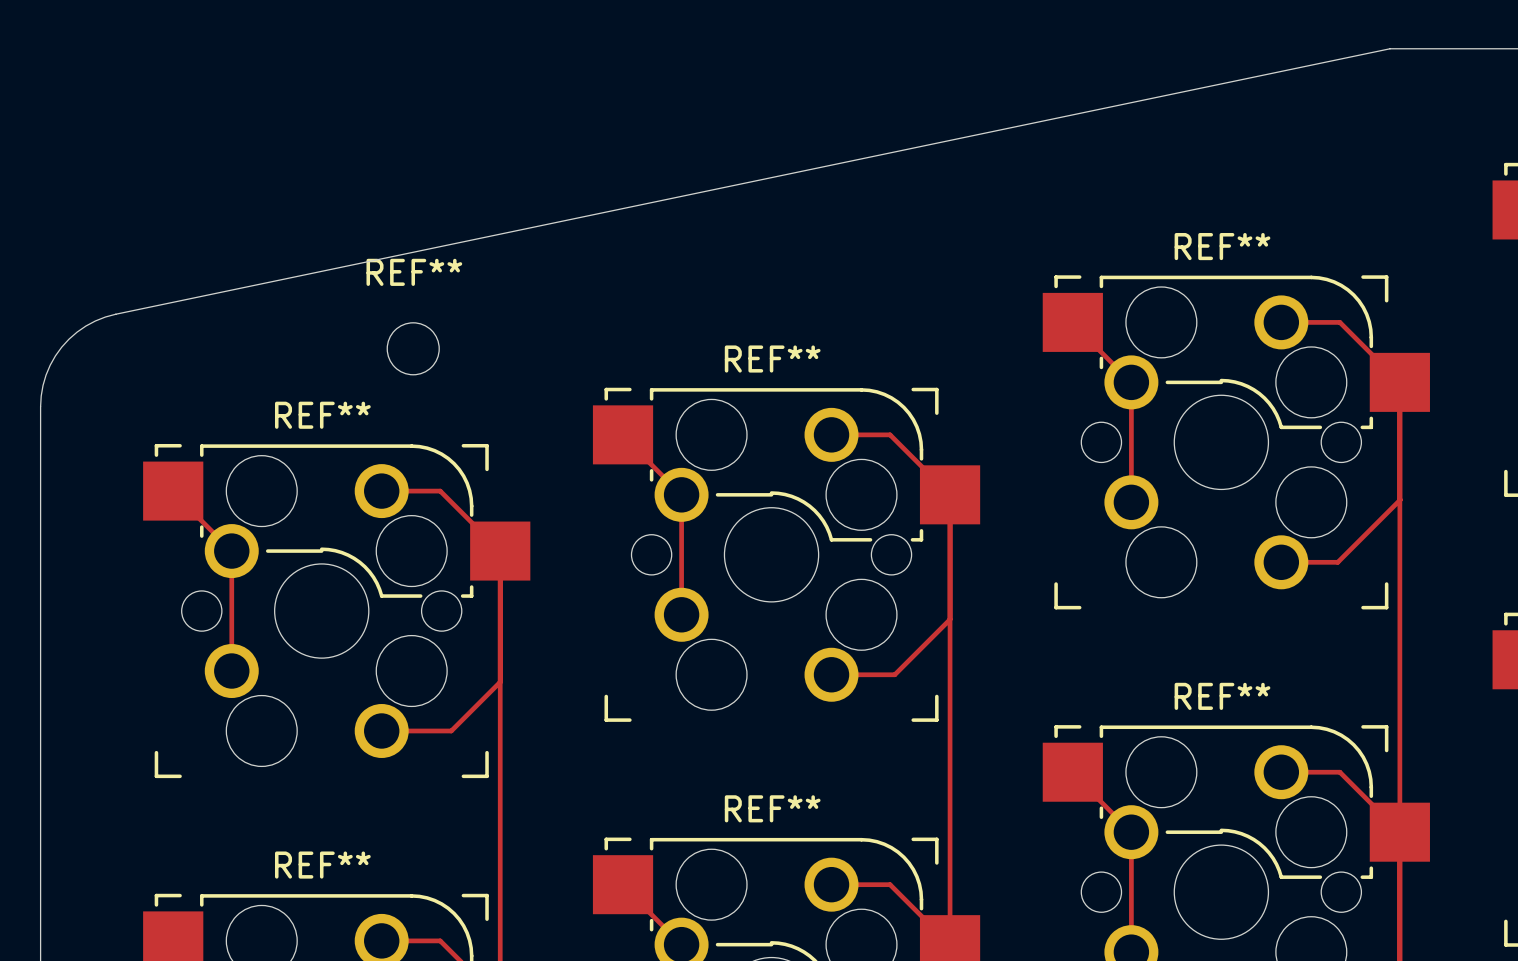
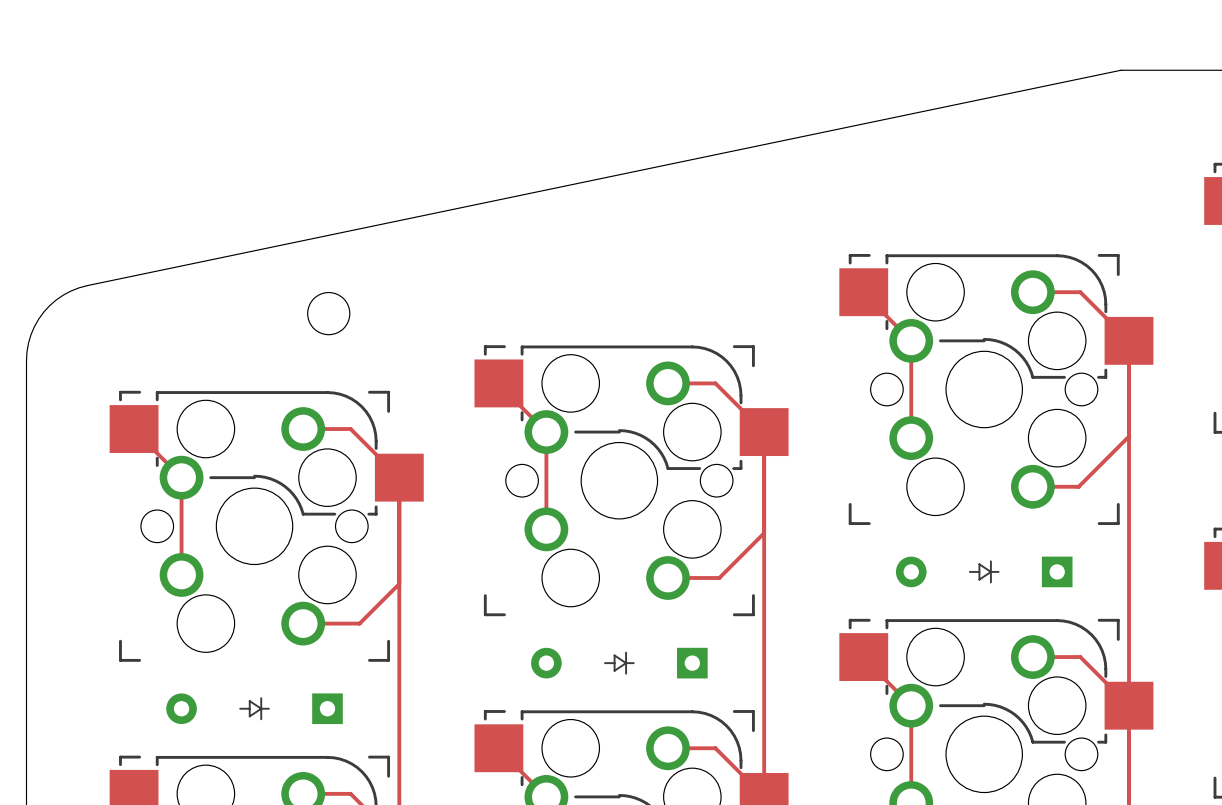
REF** name: REF** (1222, 246) -> none
REF** name: REF** (414, 272) -> none
REF** name: REF** (772, 359) -> none
REF** name: REF** (322, 415) -> none
part: none -> (984, 571)
REF** name: REF** (1222, 696) -> none
part: none -> (619, 663)
REF** name: REF** (772, 808) -> none
part: none -> (254, 708)
REF** name: REF** (322, 865) -> none

